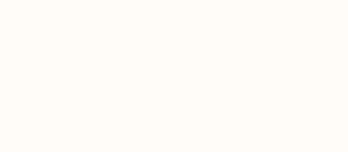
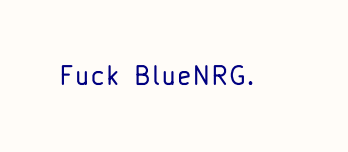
text: none -> Fuck BlueNRG. (157, 75)

